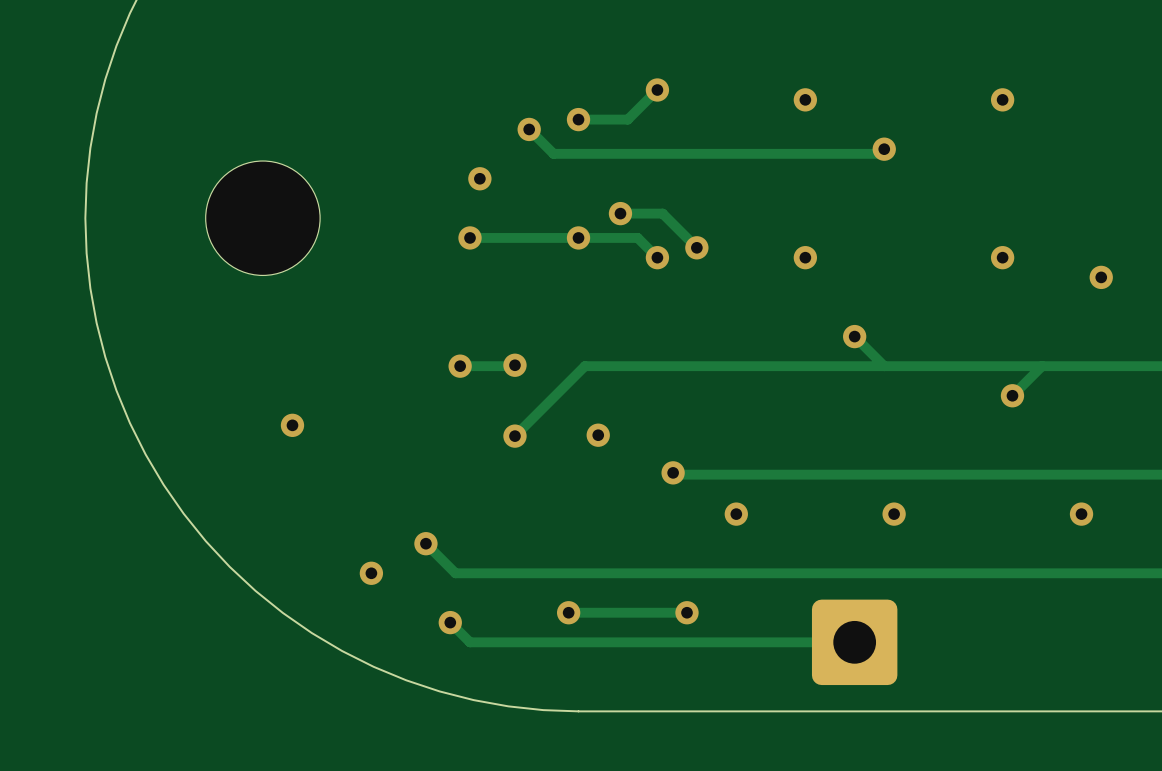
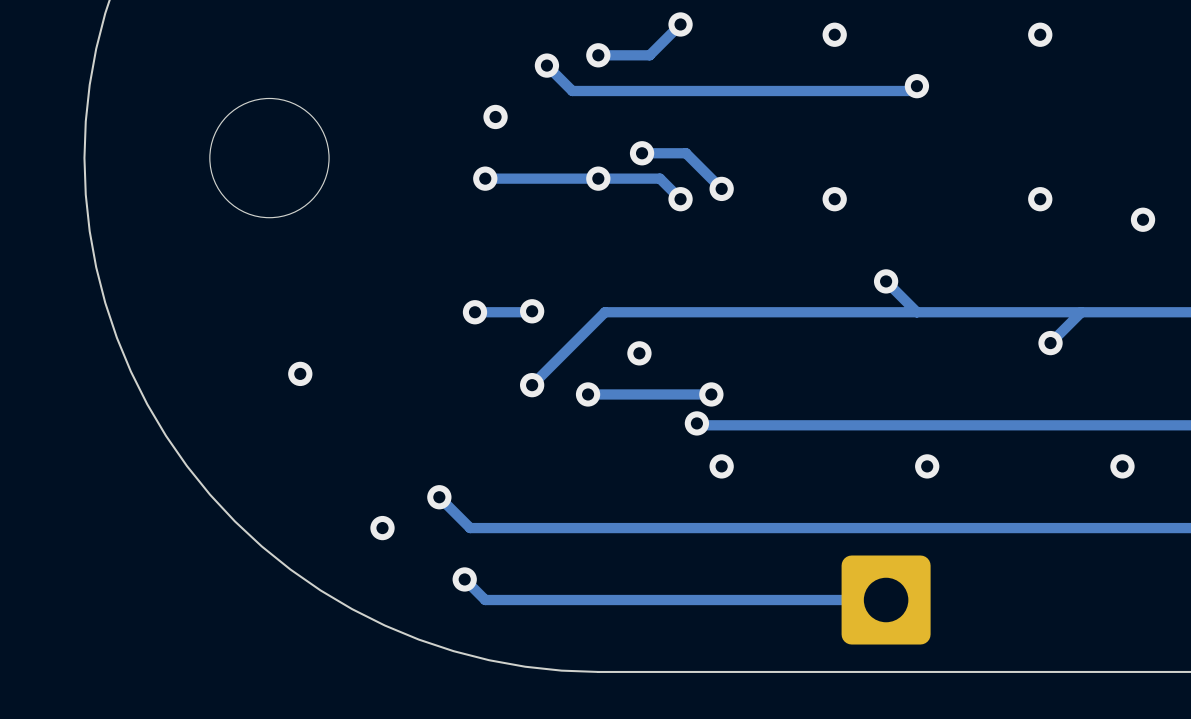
via: none -> (639, 353)
via: (598, 435) -> none
via: none -> (588, 394)
via: none -> (711, 394)
via position: (736, 514) -> (721, 466)
via: (568, 612) -> none
track: (687, 612) (568, 612) -> (711, 394) (588, 394)
via: (687, 612) -> none

